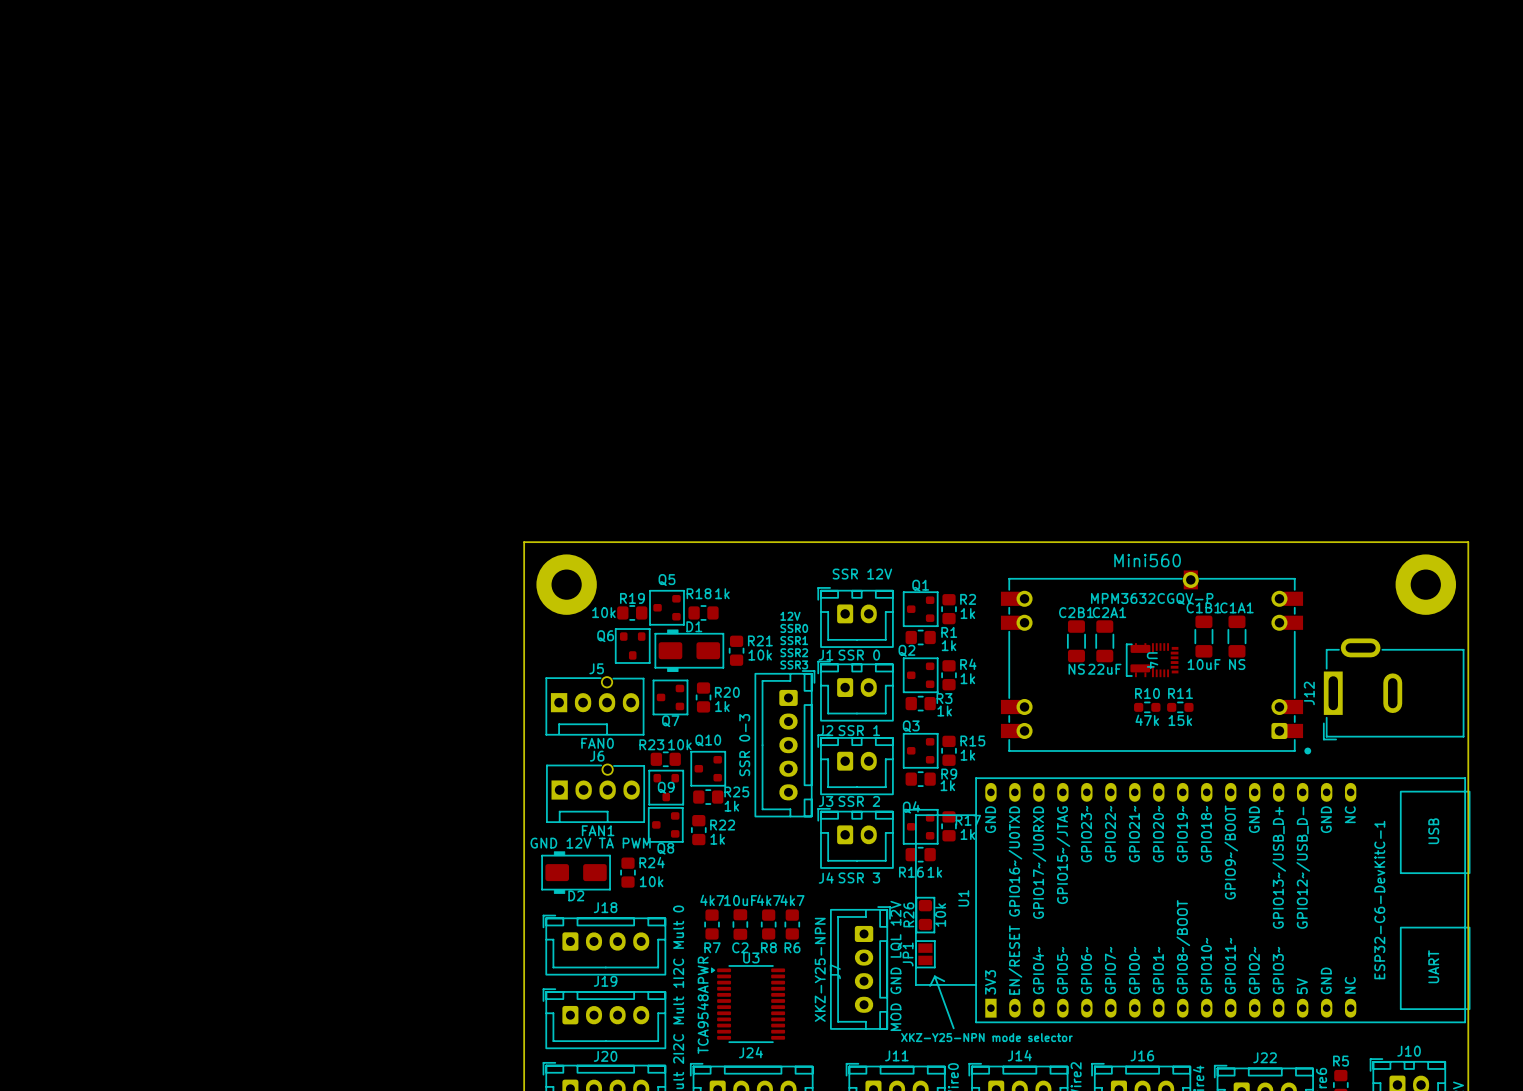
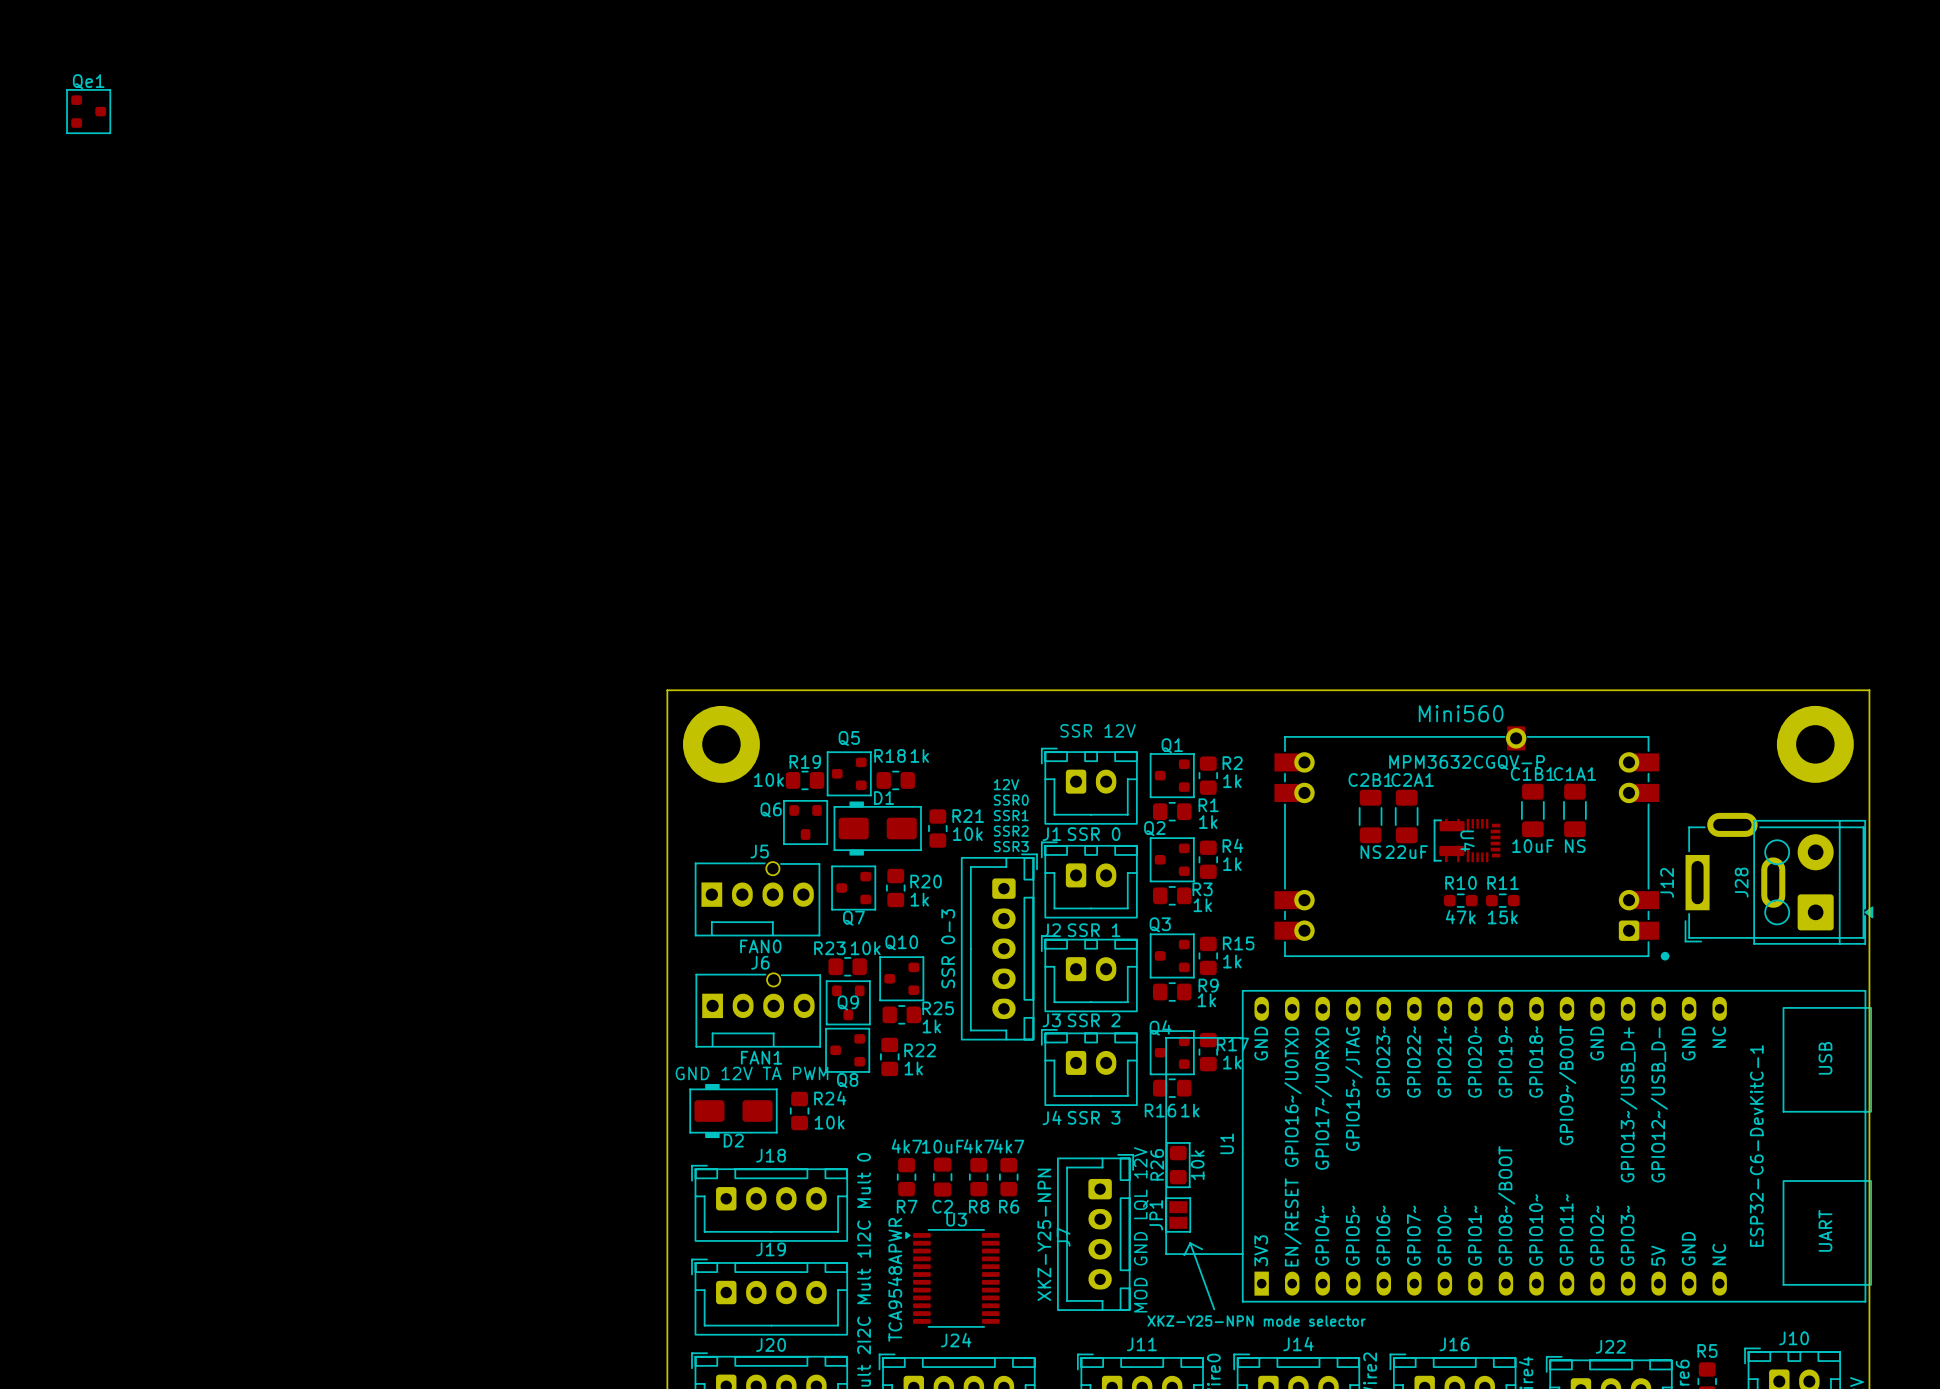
Qe1: none -> (88, 111)
J28: none -> (1813, 882)

